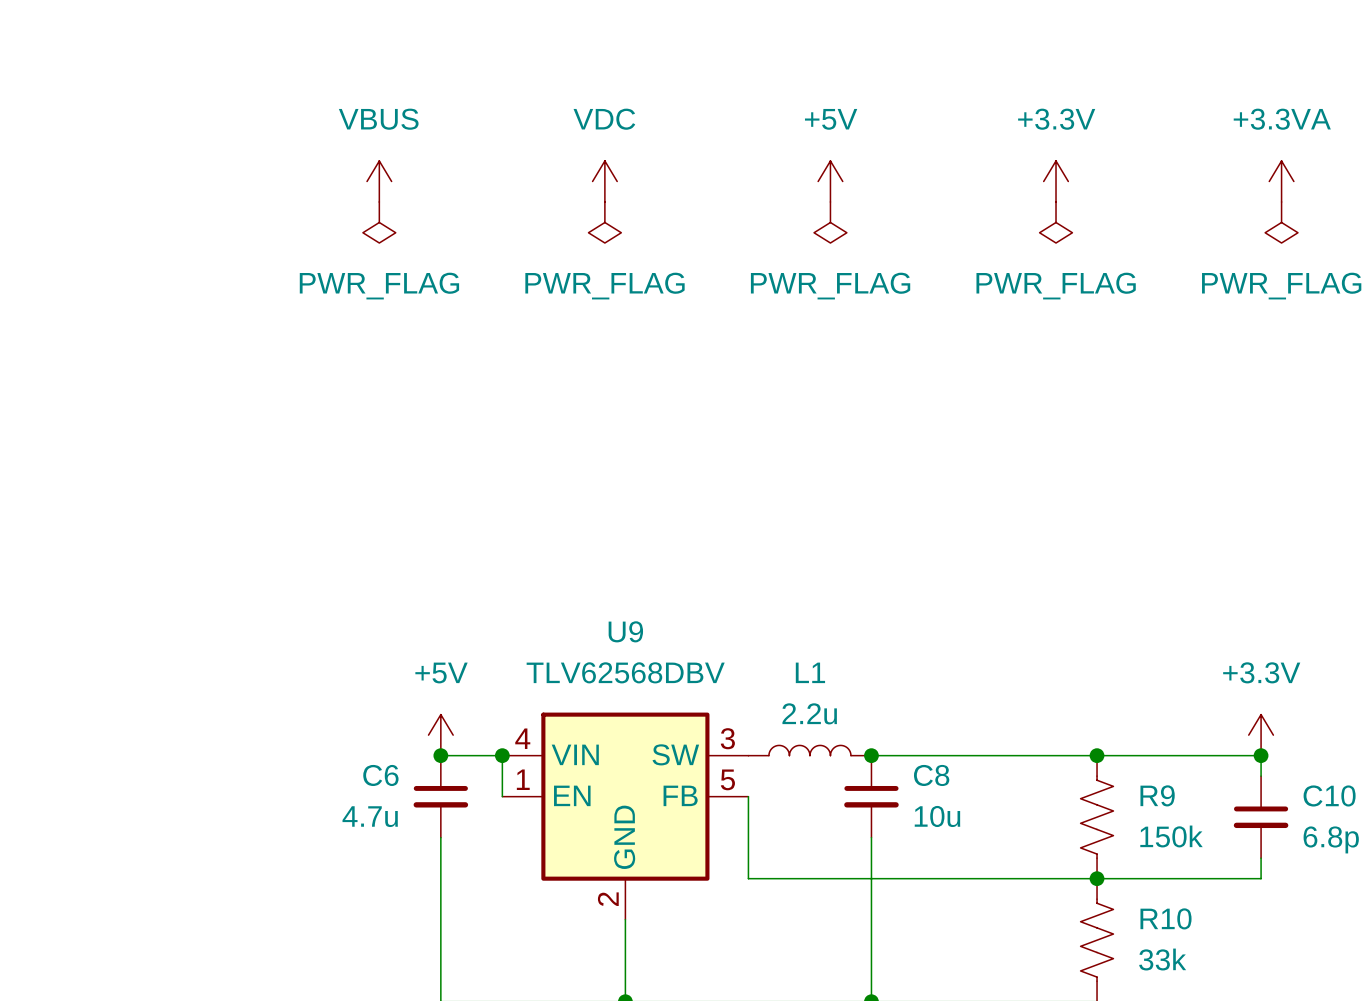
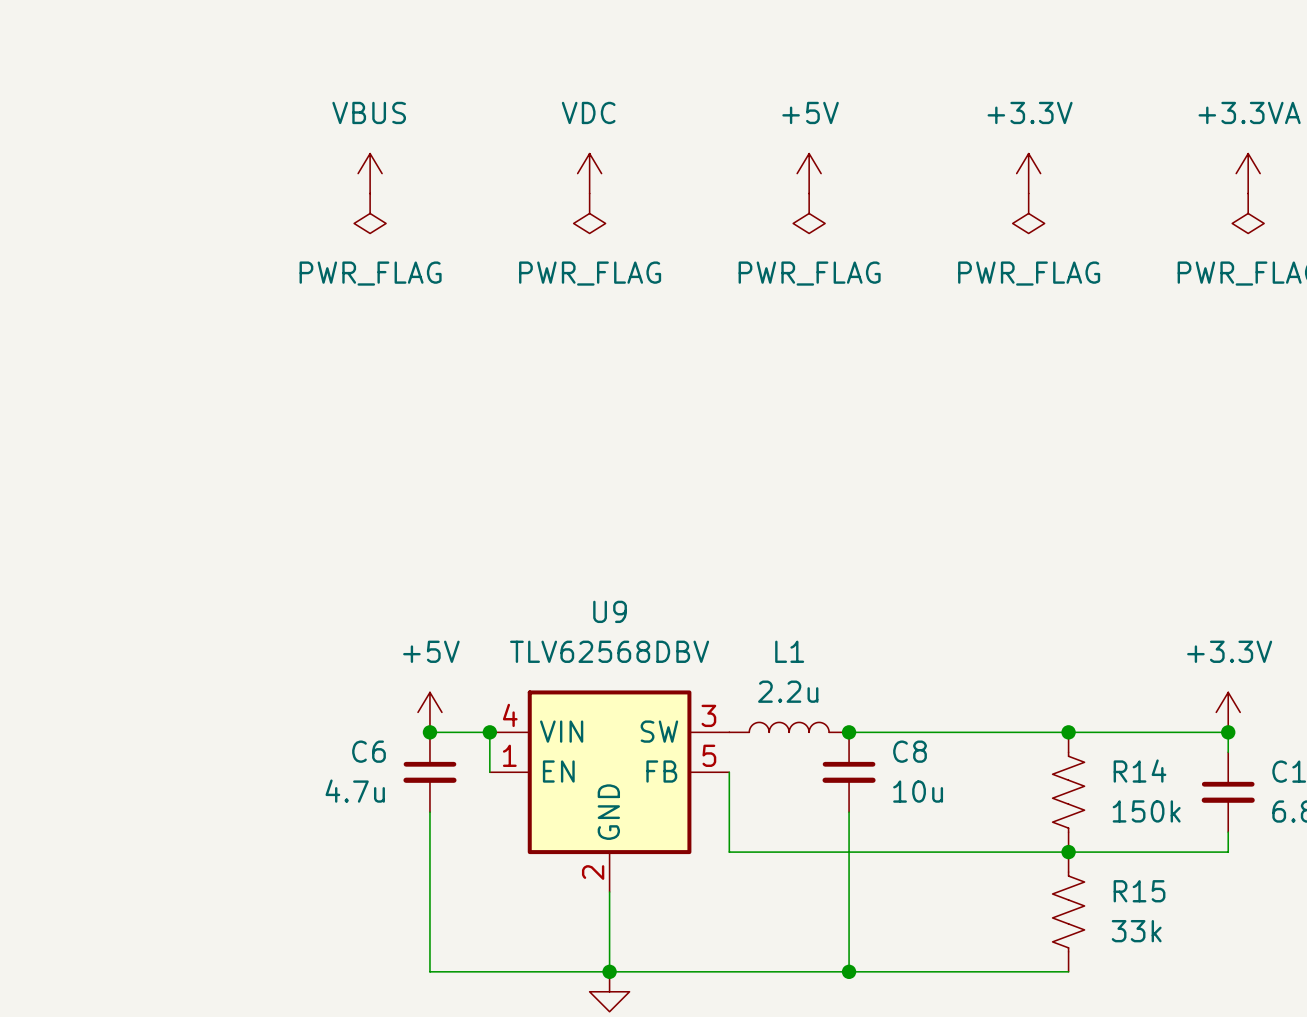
R9 name: R9 (1157, 795) -> R14 (1139, 771)
R10 name: R10 (1166, 918) -> R15 (1139, 891)

